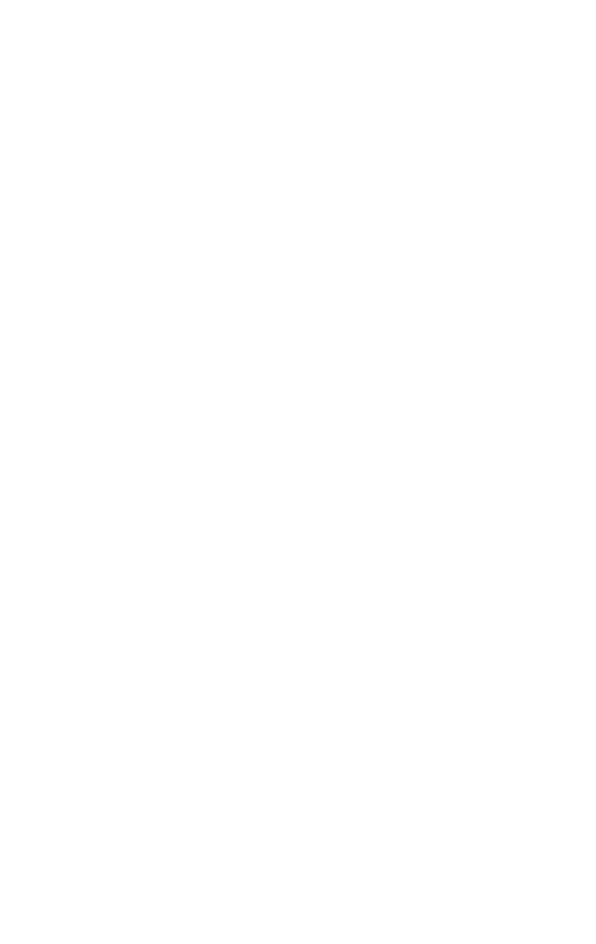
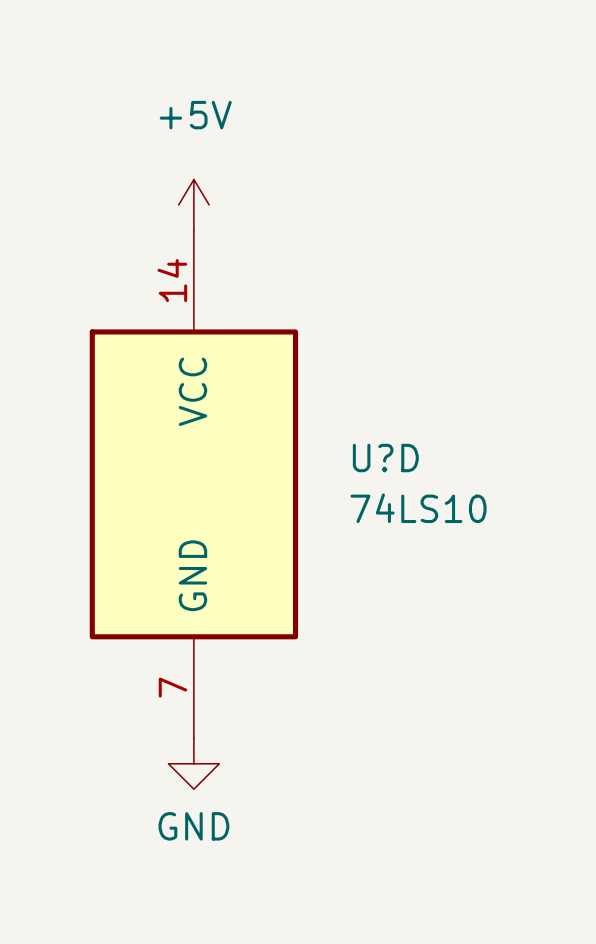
power symbol: none -> +5V (193, 204)
U?D: none -> 74LS10 (193, 484)
power symbol: none -> GND (193, 763)

